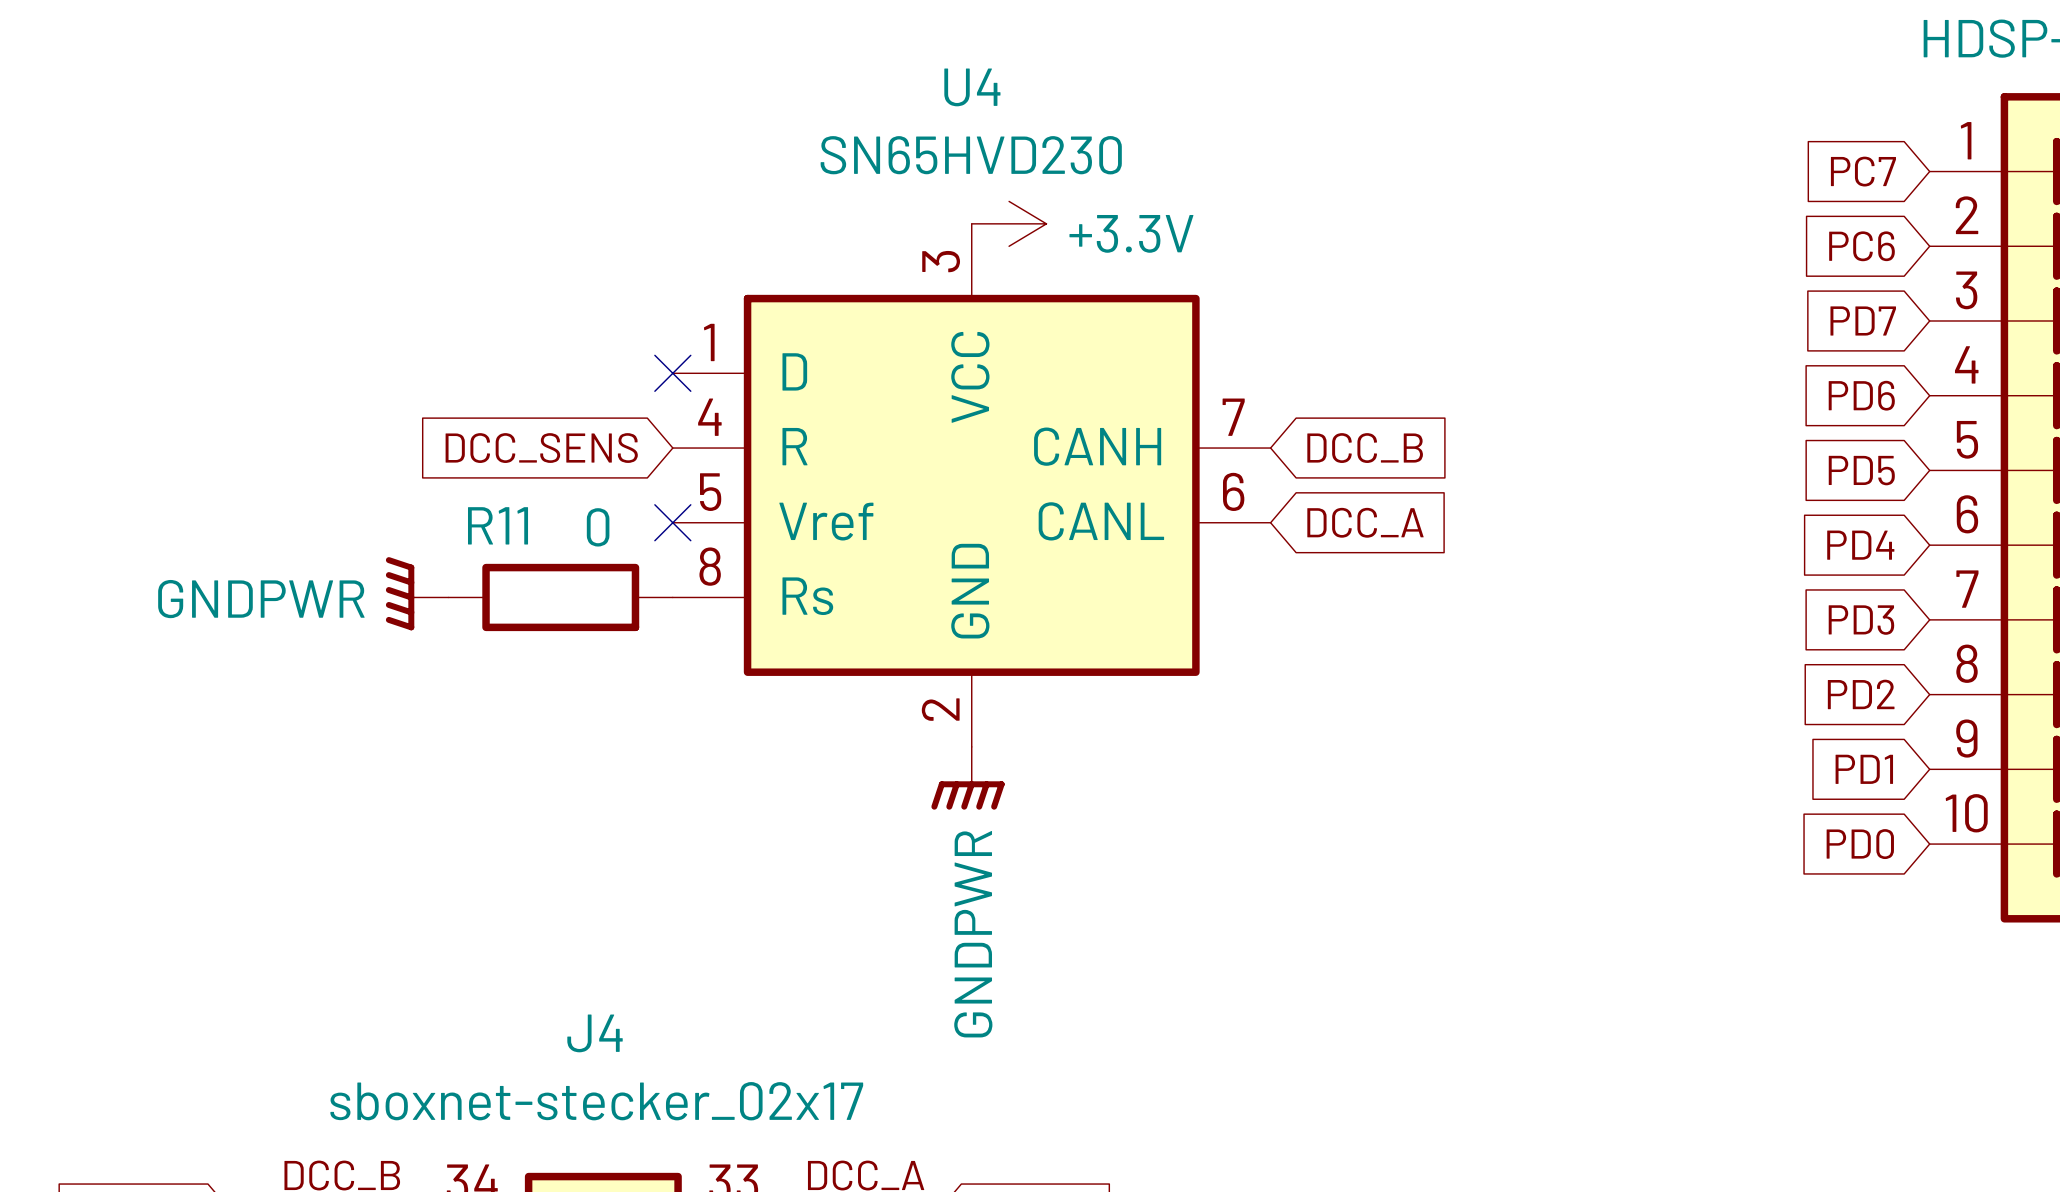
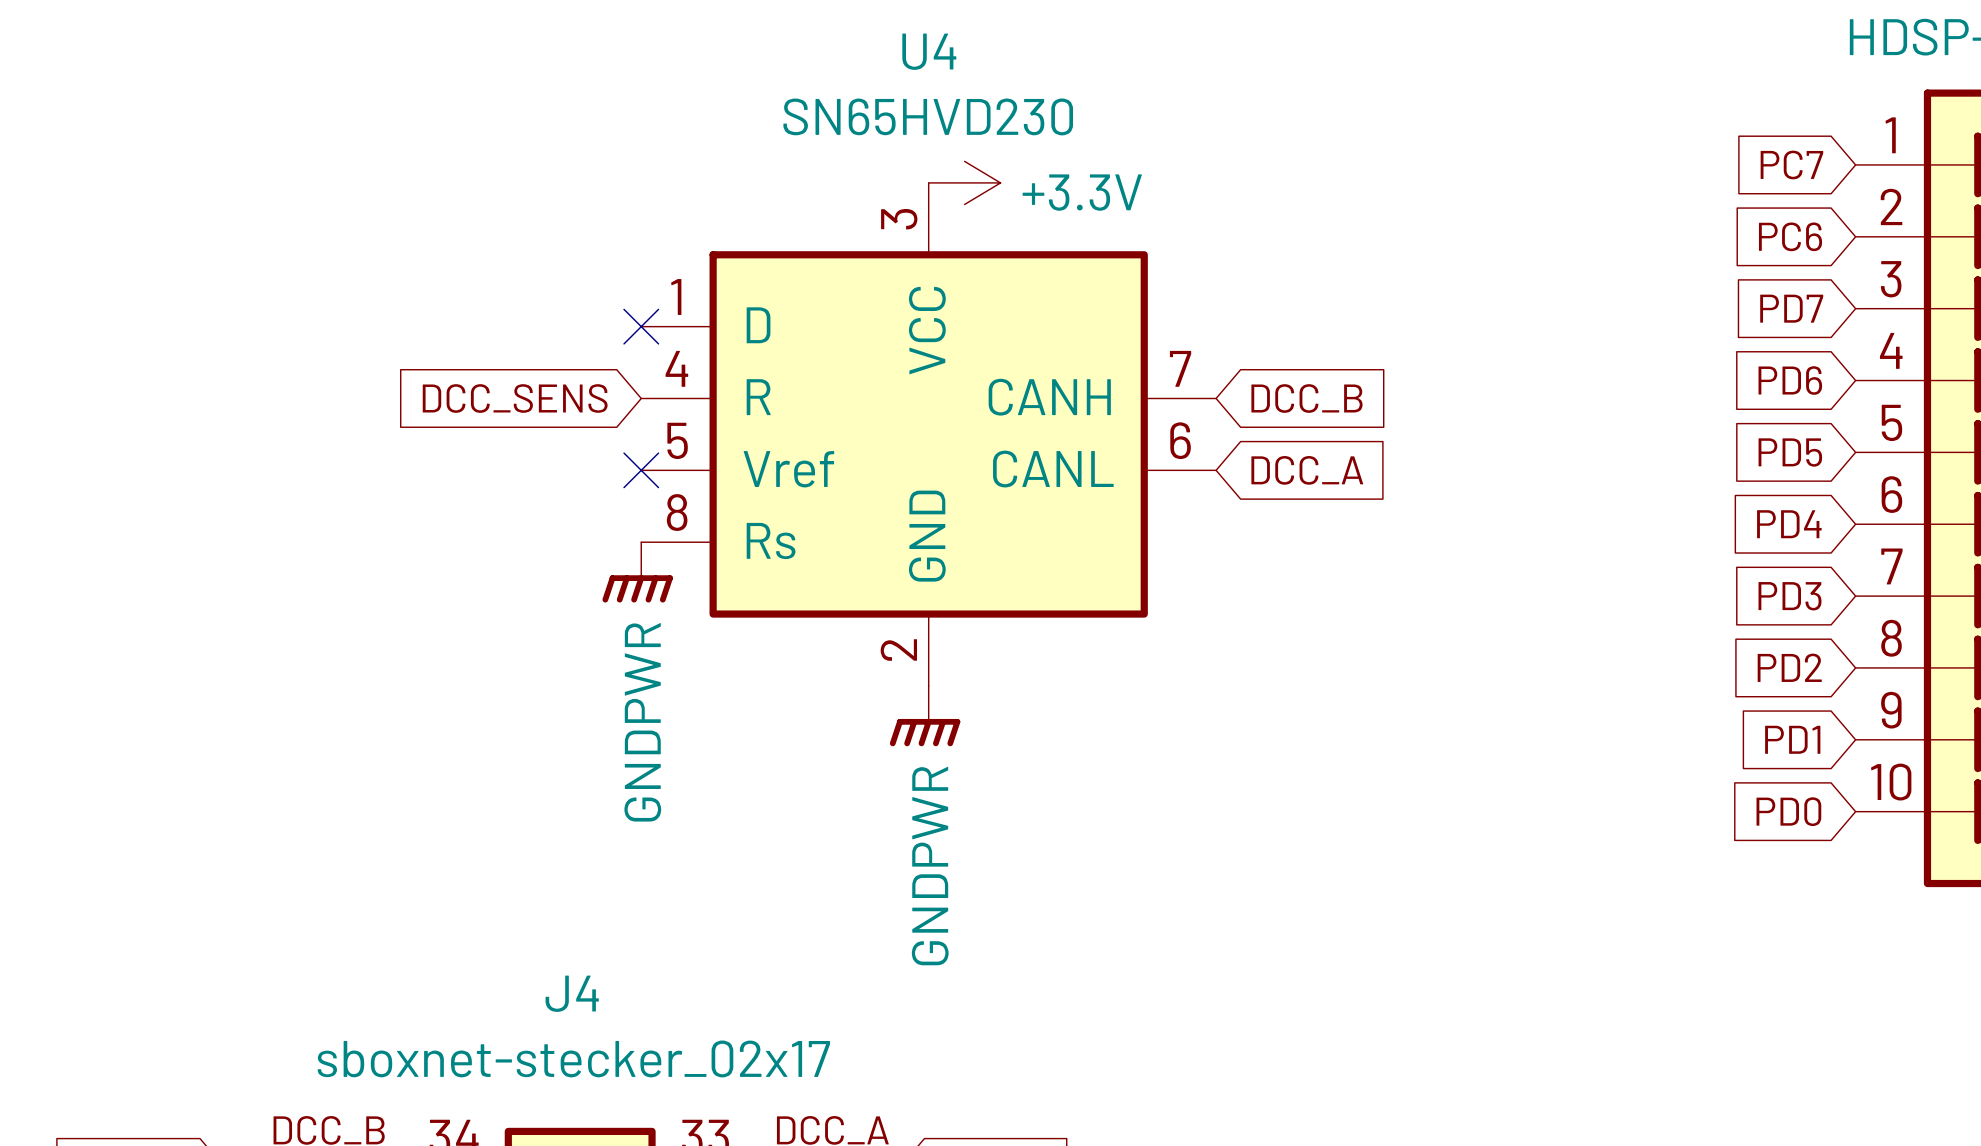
power symbol position: +3.3V (1009, 223) -> +3.3V (964, 182)
no-connect mark position: (672, 373) -> (641, 326)
global label position: DCC_SENS (541, 448) -> DCC_SENS (515, 398)
global label position: DCC_B (1365, 448) -> DCC_B (1306, 398)
U4 position: (971, 485) -> (928, 434)
no-connect mark position: (672, 522) -> (641, 470)
global label position: DCC_A (1365, 522) -> DCC_A (1307, 470)
power symbol: GNDPWR (417, 593) -> none
power symbol: none -> GNDPWR (637, 572)
R11: 0 (560, 597) -> none
power symbol position: GNDPWR (967, 778) -> GNDPWR (925, 716)

